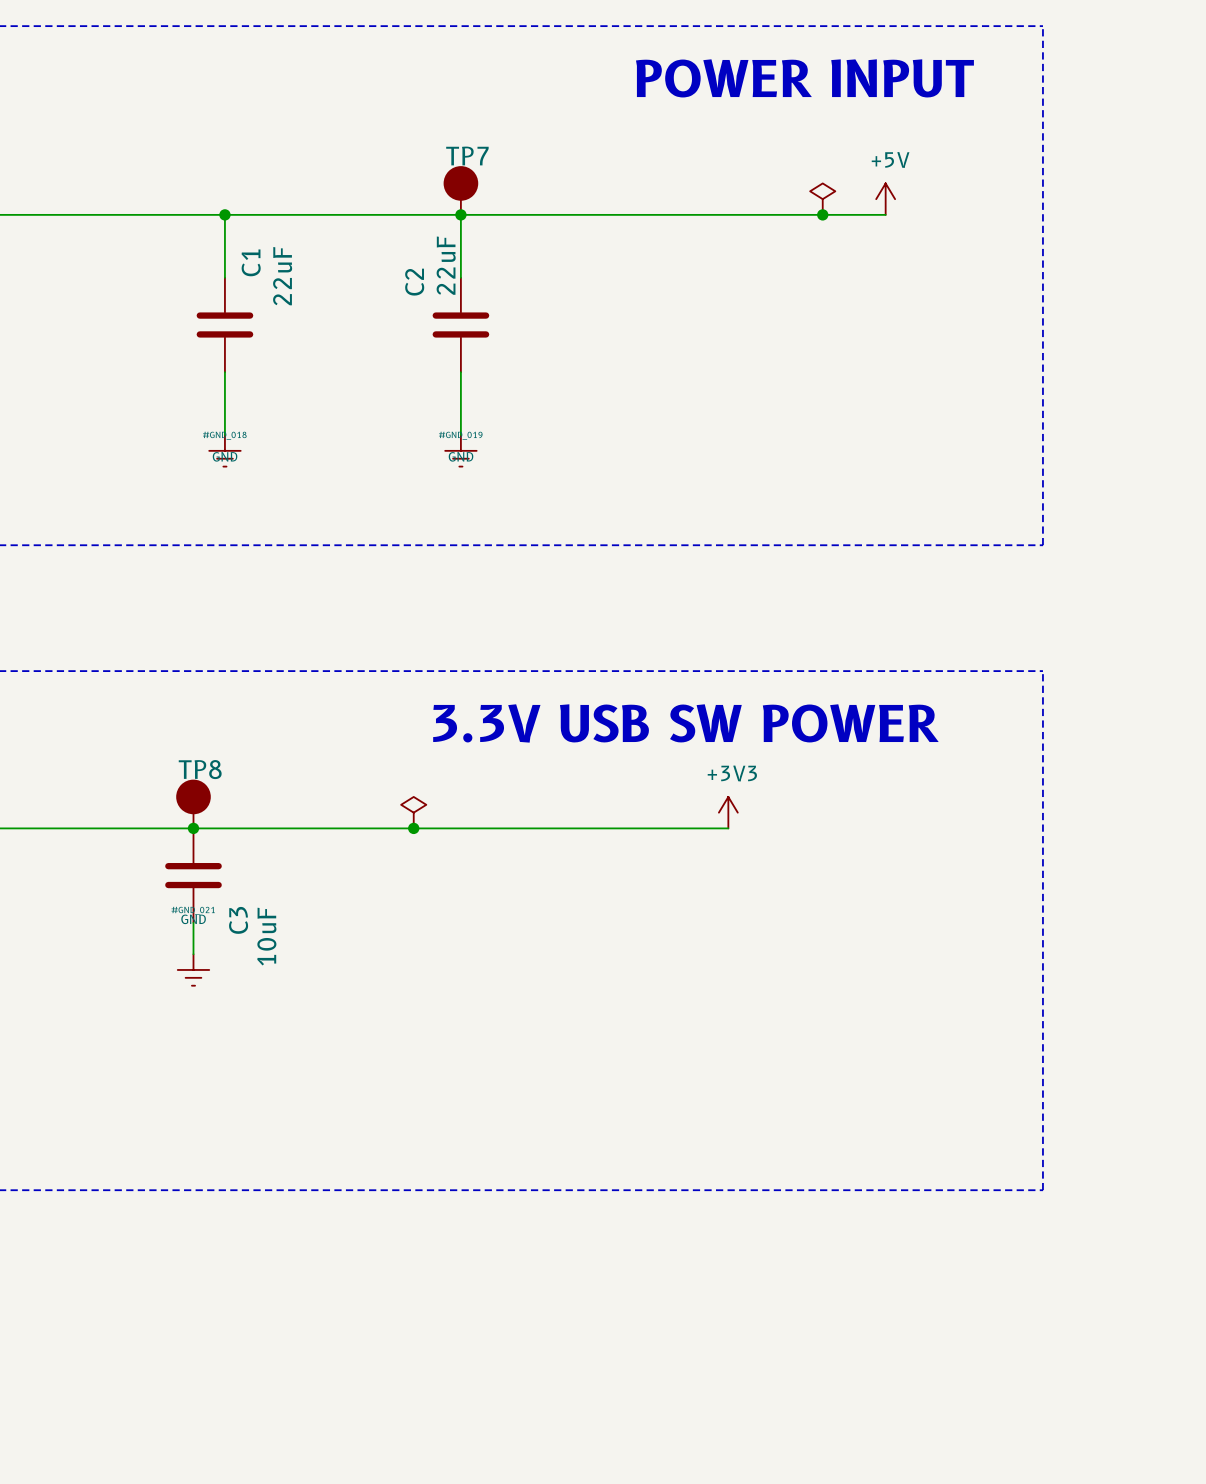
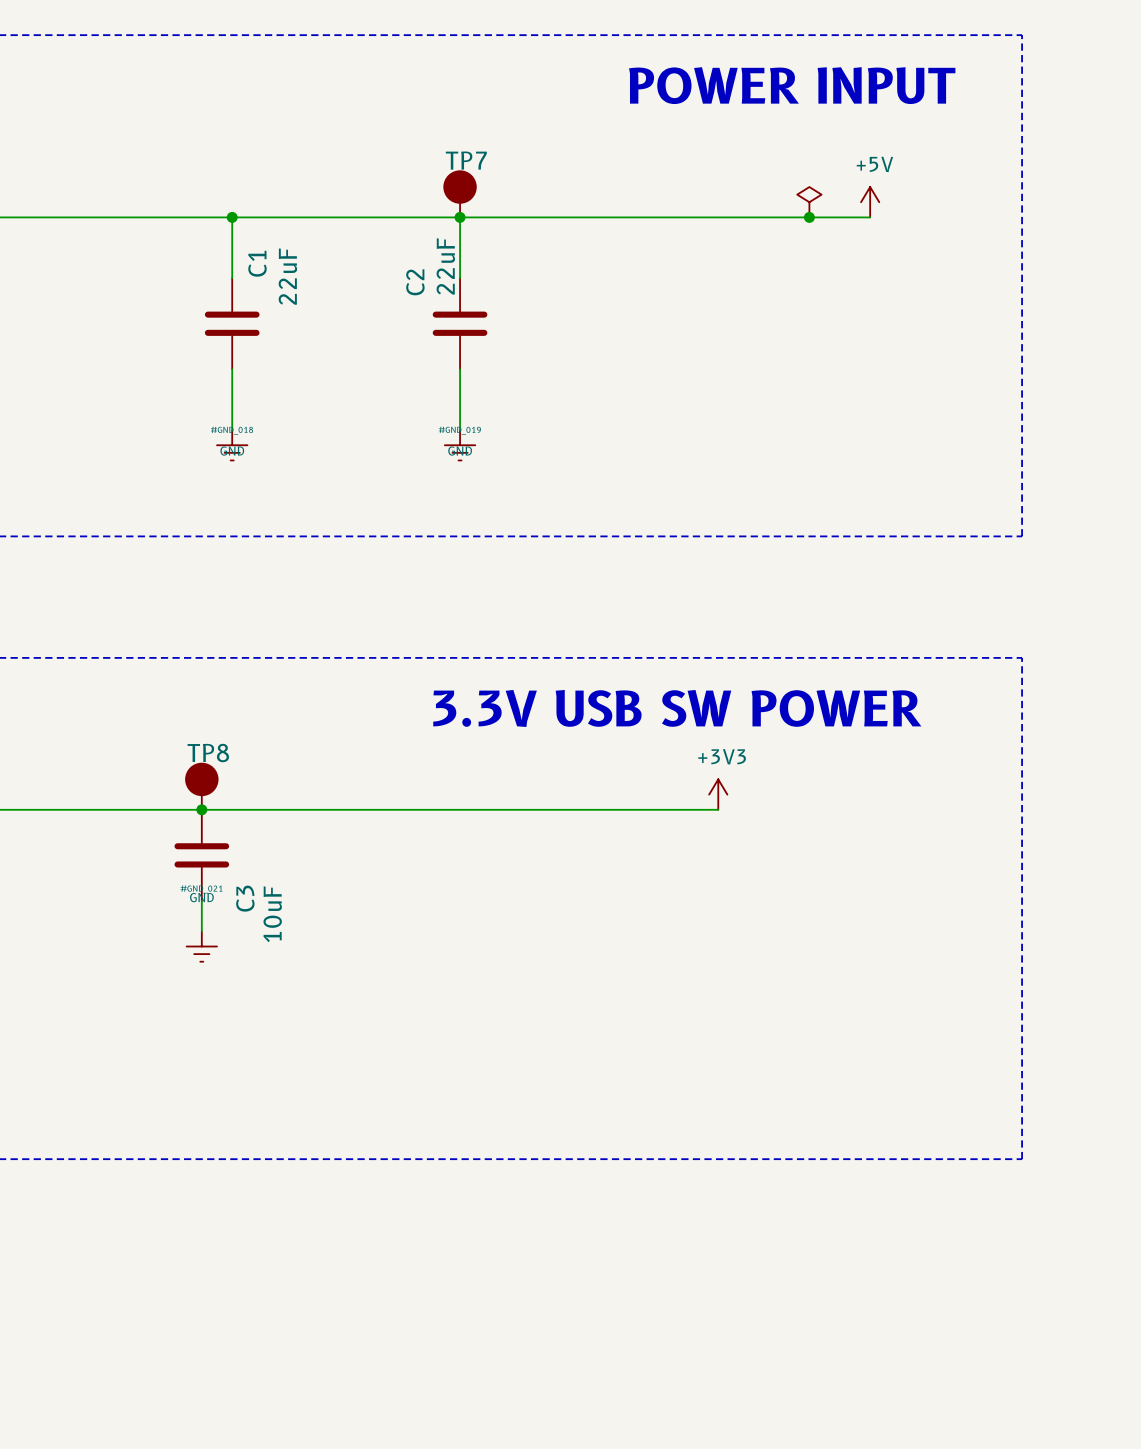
power symbol: (413, 812) -> none
junction: (413, 828) -> none

